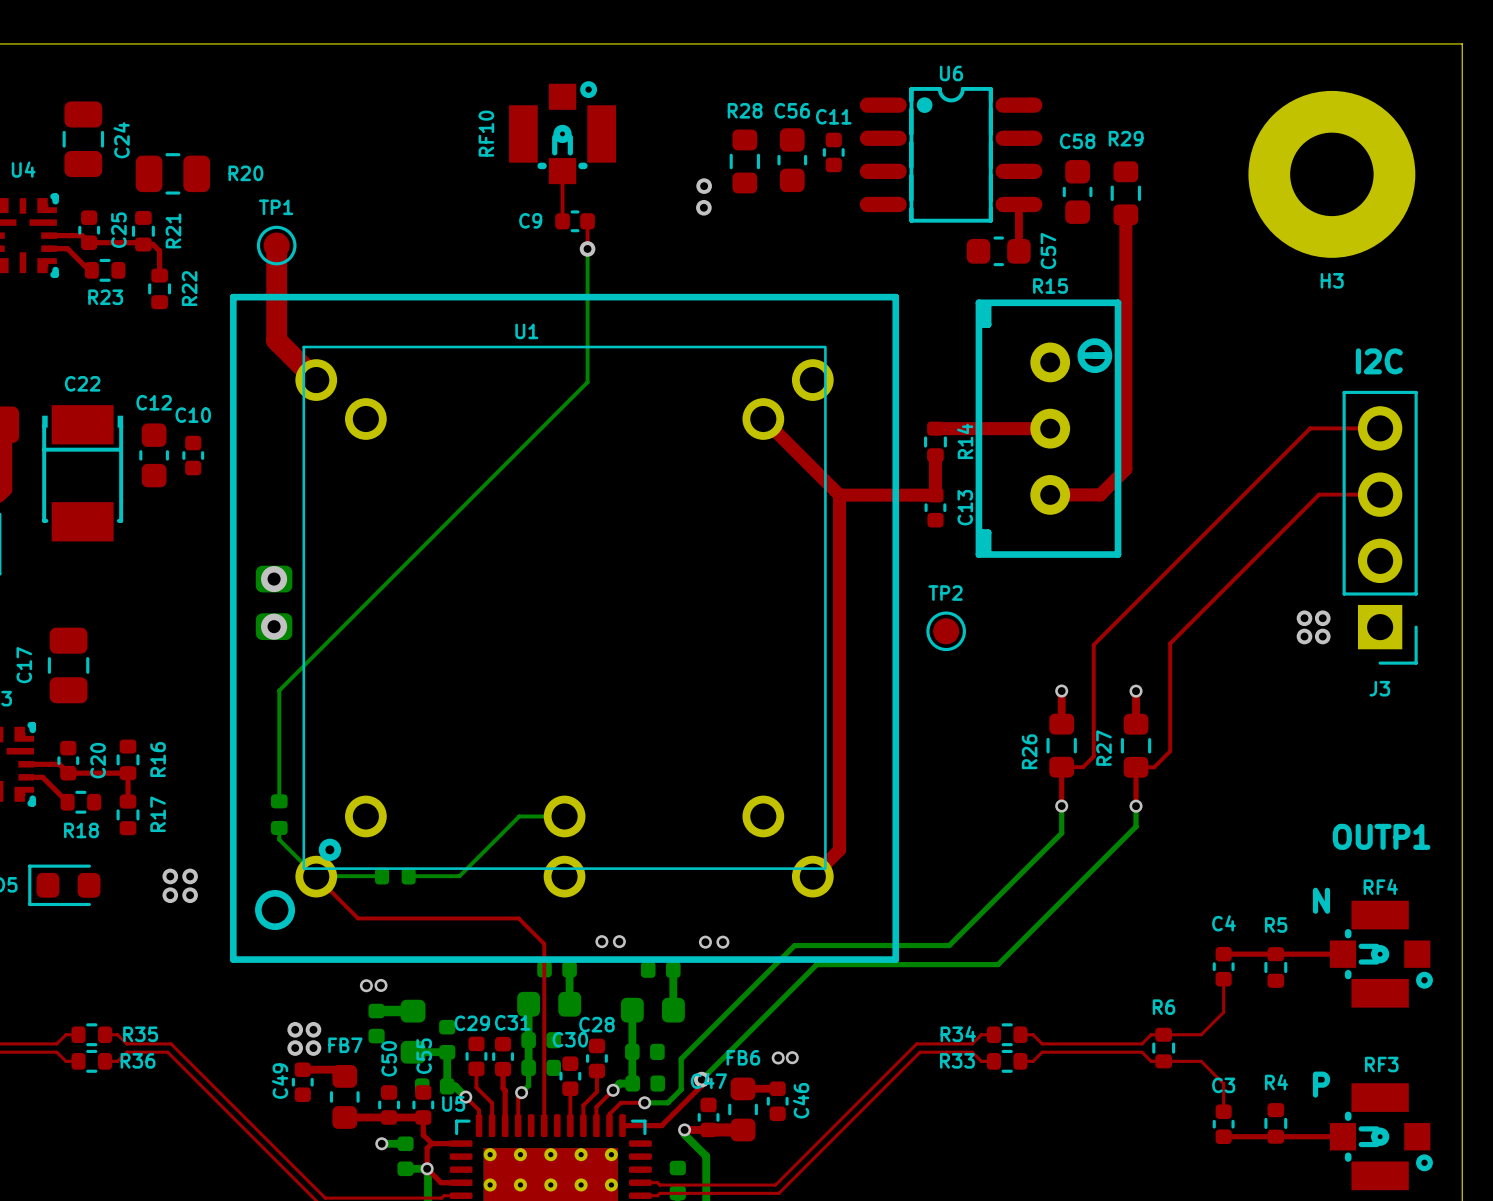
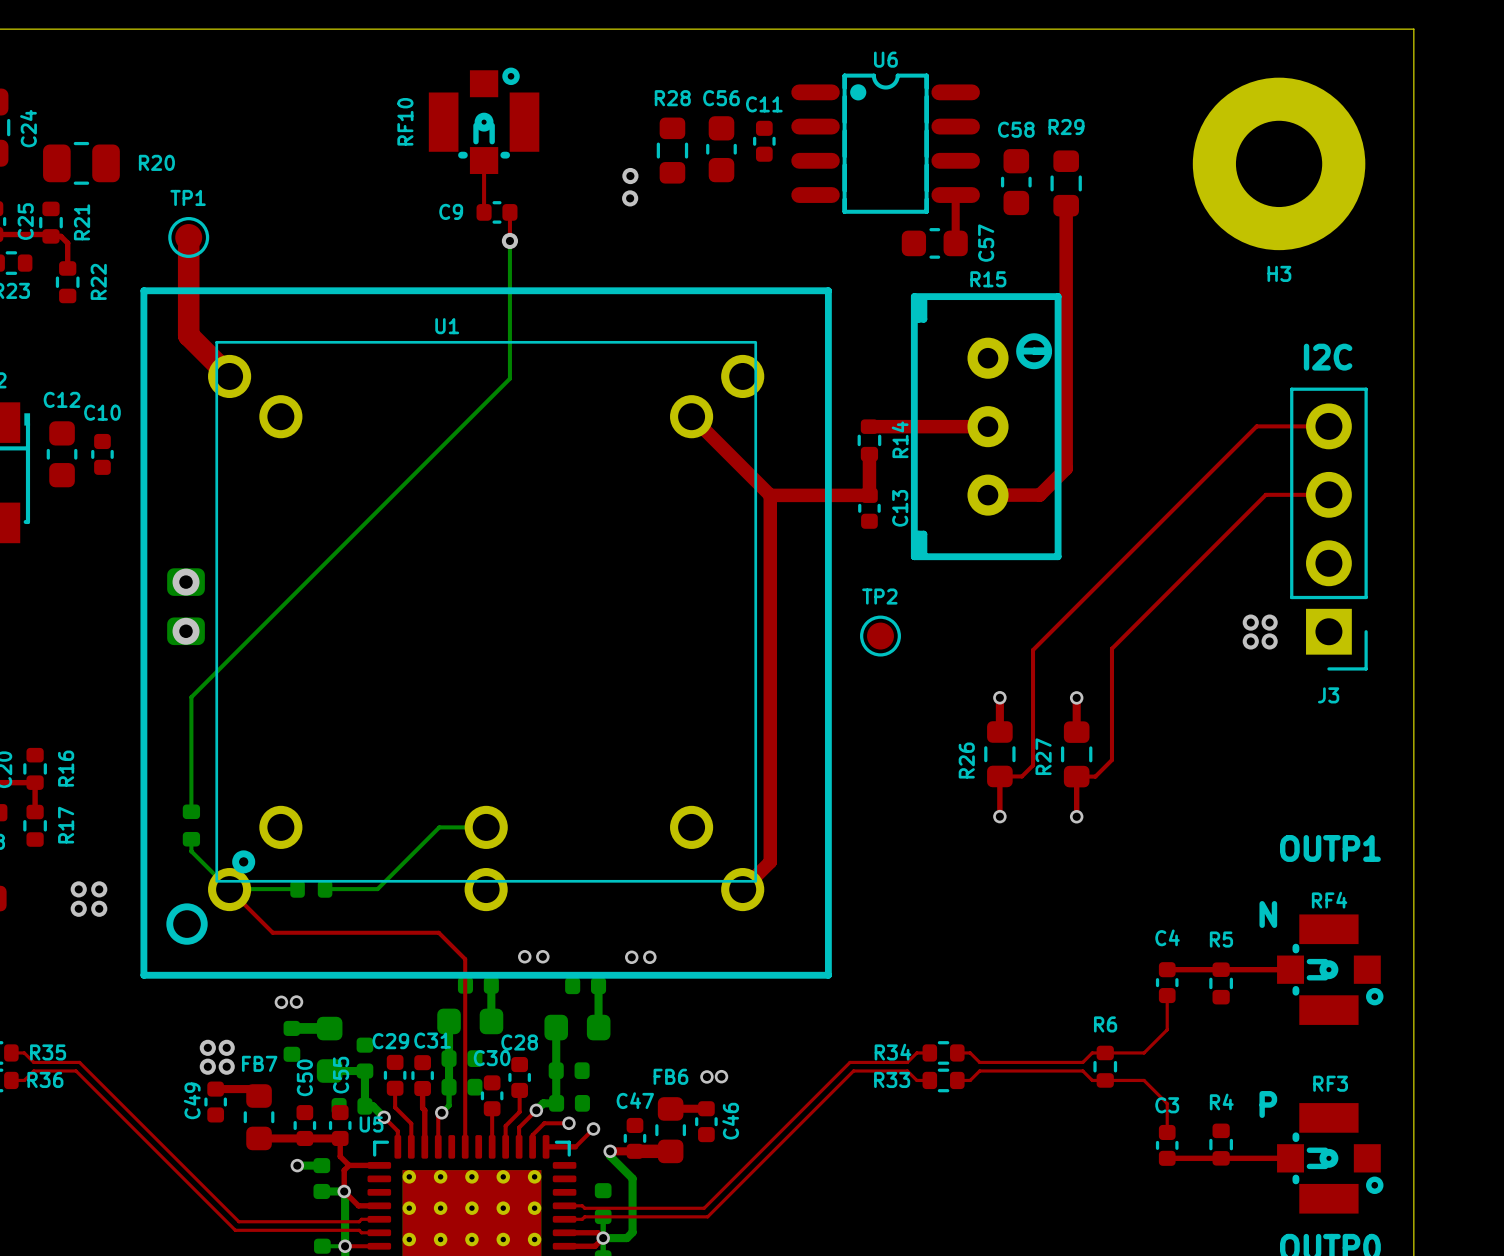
bottom track: (1061, 806) (1061, 833) (949, 945) (794, 945) (681, 1059) (681, 1089) (667, 1102) (644, 1102) -> none
bottom track: (1136, 806) (1136, 826) (998, 964) (816, 964) (701, 1079) -> none
top track: (701, 1079) (701, 1085) (661, 1125) (651, 1125) -> (593, 1128) (575, 1146)
via: (701, 1079) -> none
via: none -> (593, 1128)

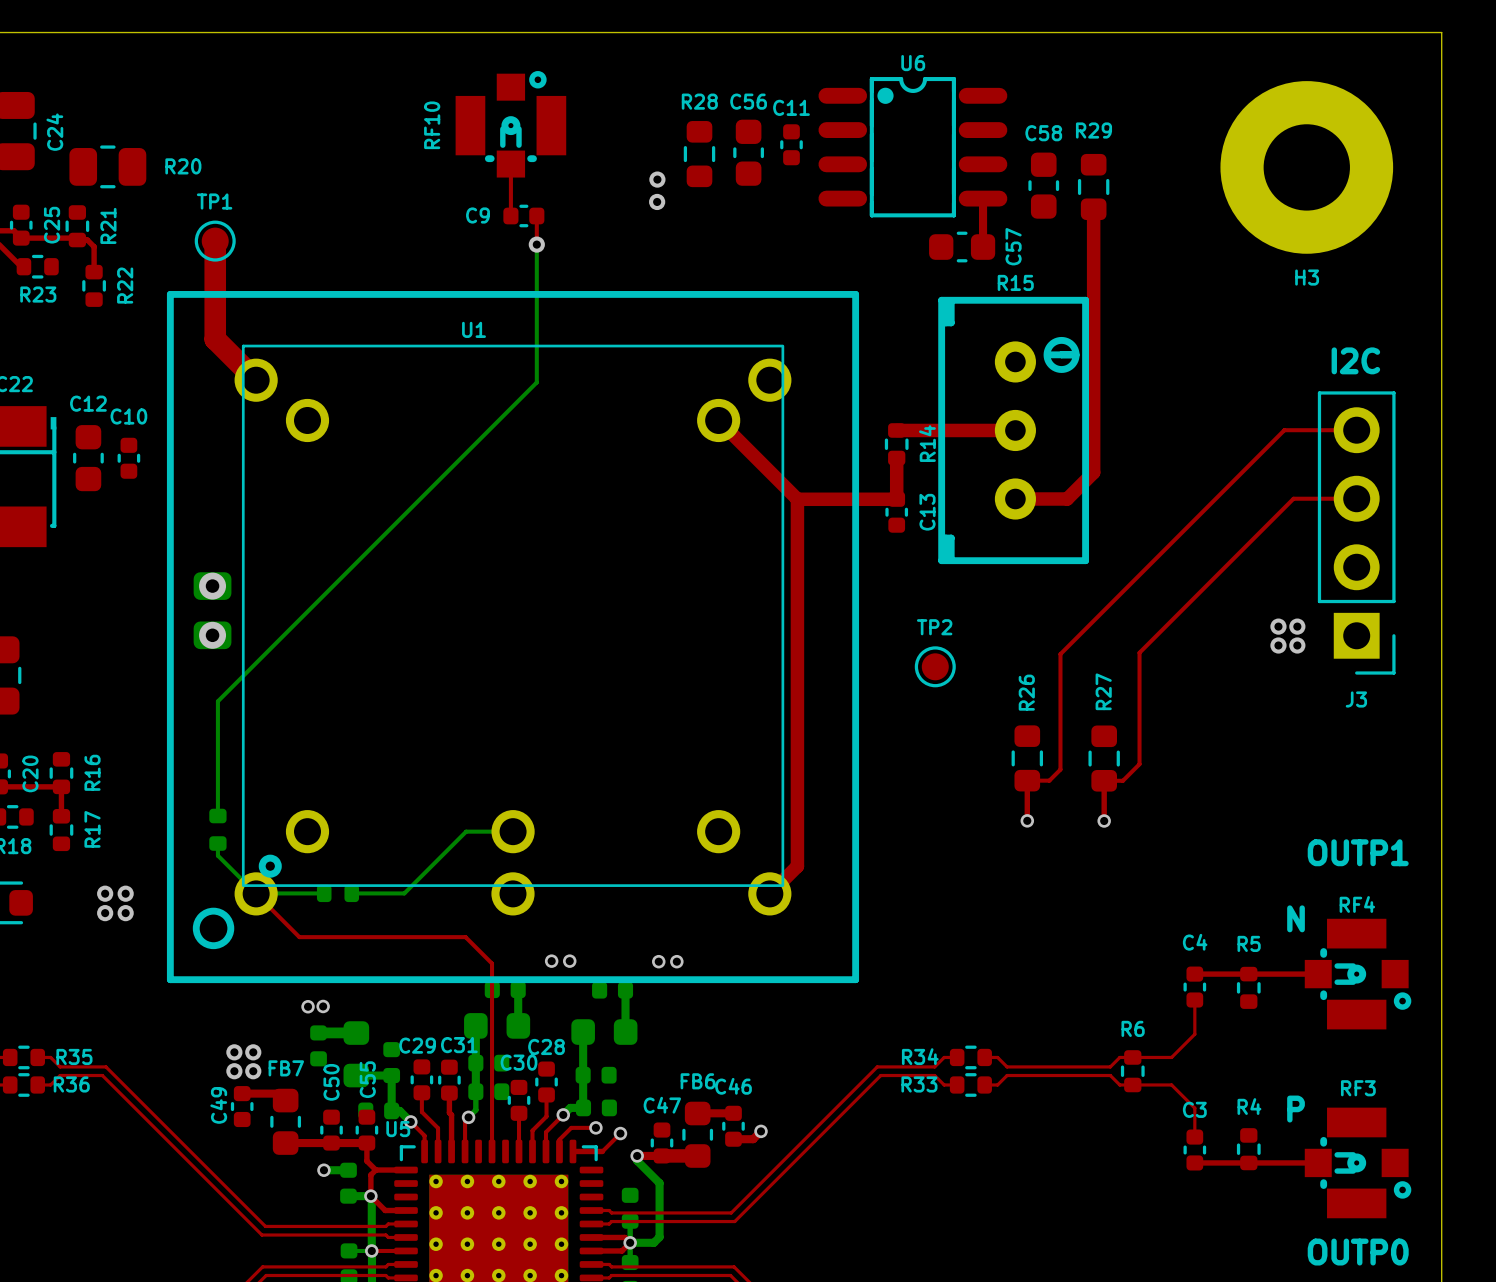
TP2 position: (880, 636) -> (935, 666)
top track: (999, 697) (999, 731) -> none
via: (999, 697) -> none
top track: (1076, 697) (1076, 732) -> none
via: (1076, 697) -> none
R27 name position: R27 (1043, 756) -> R27 (1103, 691)
R26 name position: R26 (966, 760) -> R26 (1026, 692)
via: (706, 1076) -> none
via: (721, 1076) -> none
C46 name rotation: 0° (730, 1121) -> 90° clockwise (733, 1086)
top track: none -> (761, 1131) (753, 1139) (733, 1139)
via: none -> (761, 1131)

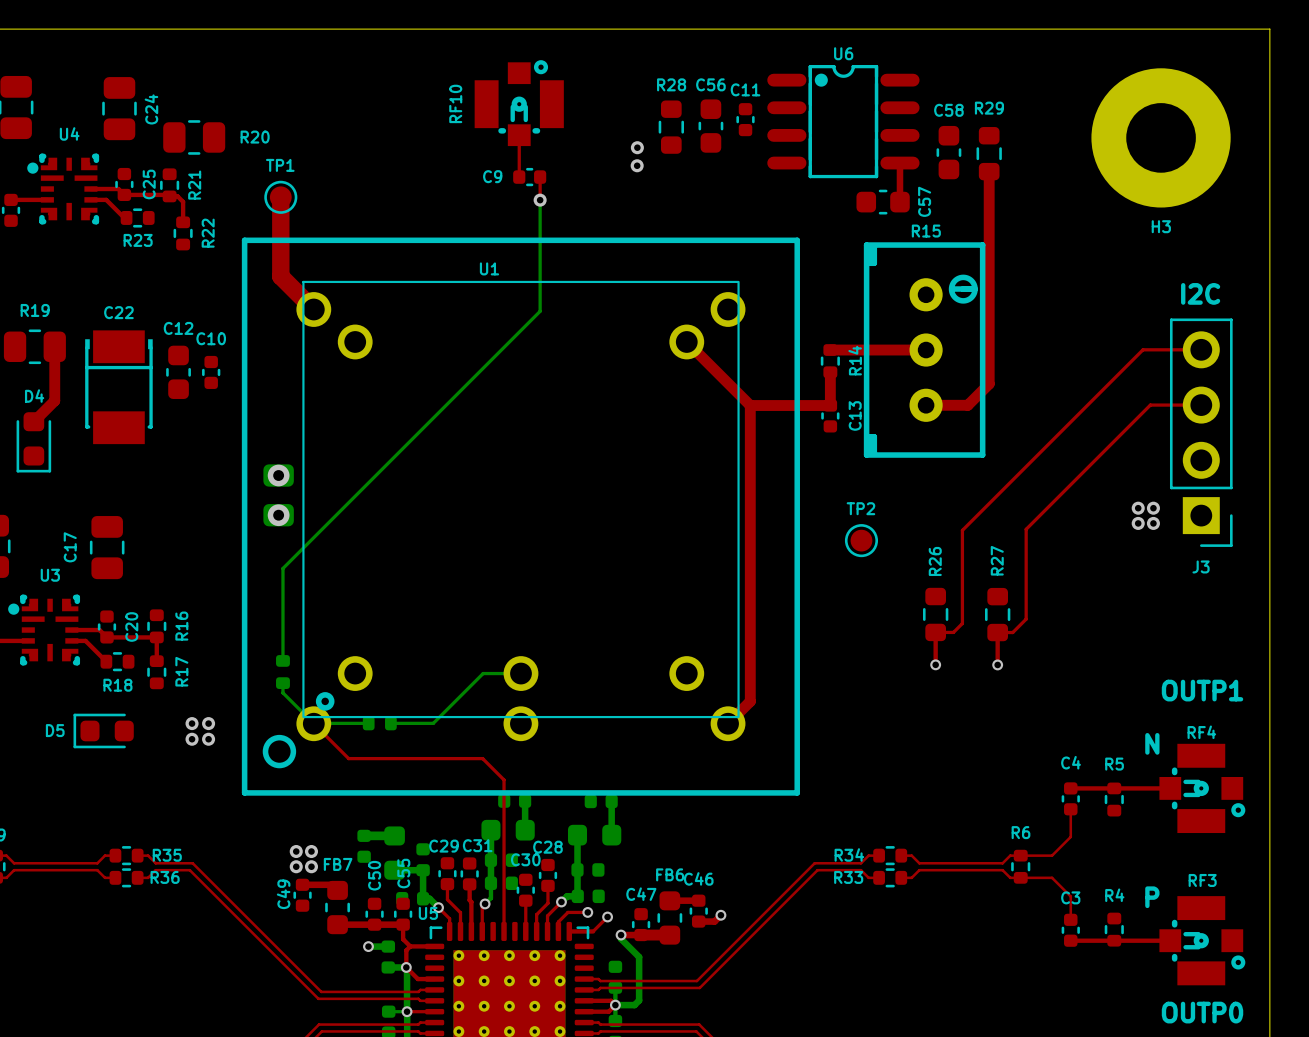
via: (551, 961) -> none
via: (569, 961) -> none
via: (658, 961) -> none
via: (676, 961) -> none
via: (308, 1006) -> none
via: (323, 1006) -> none

